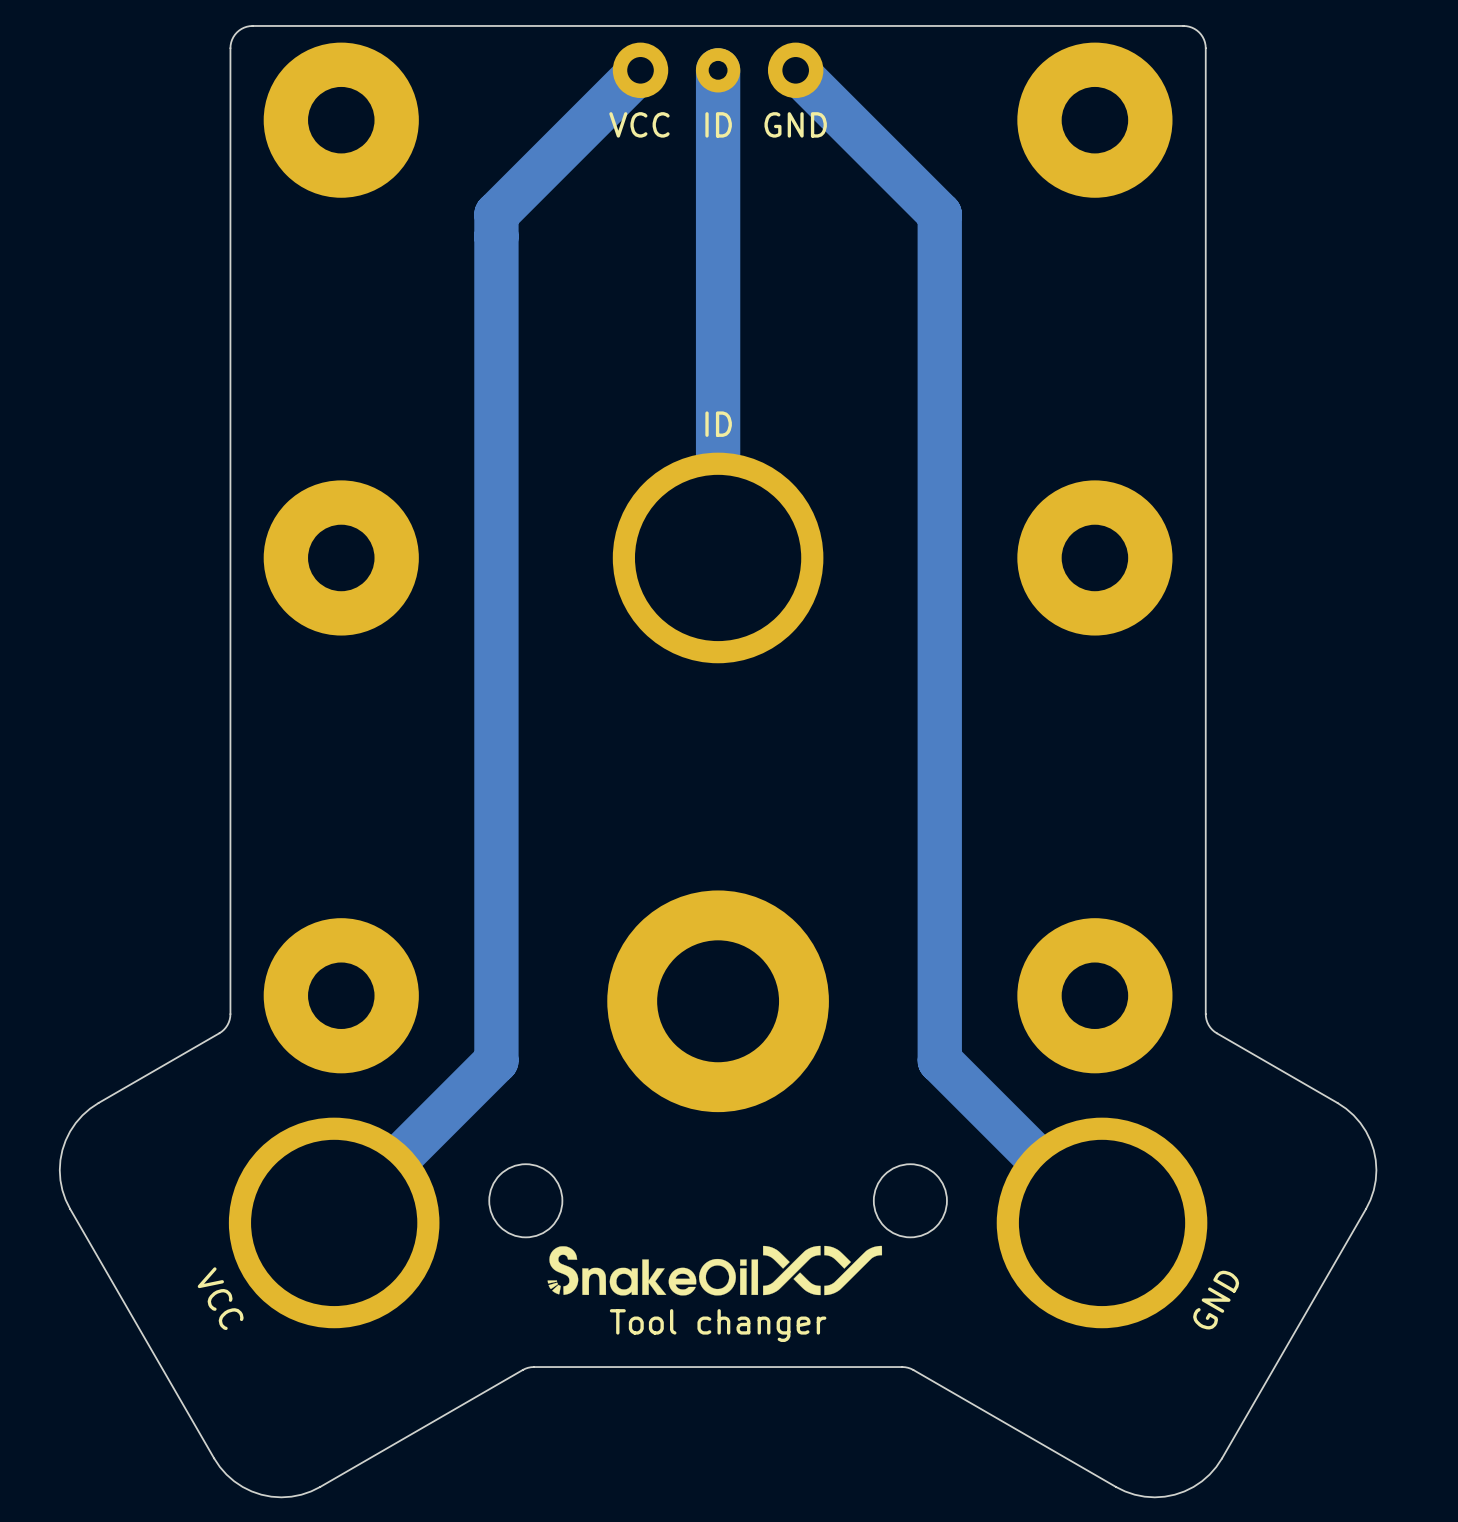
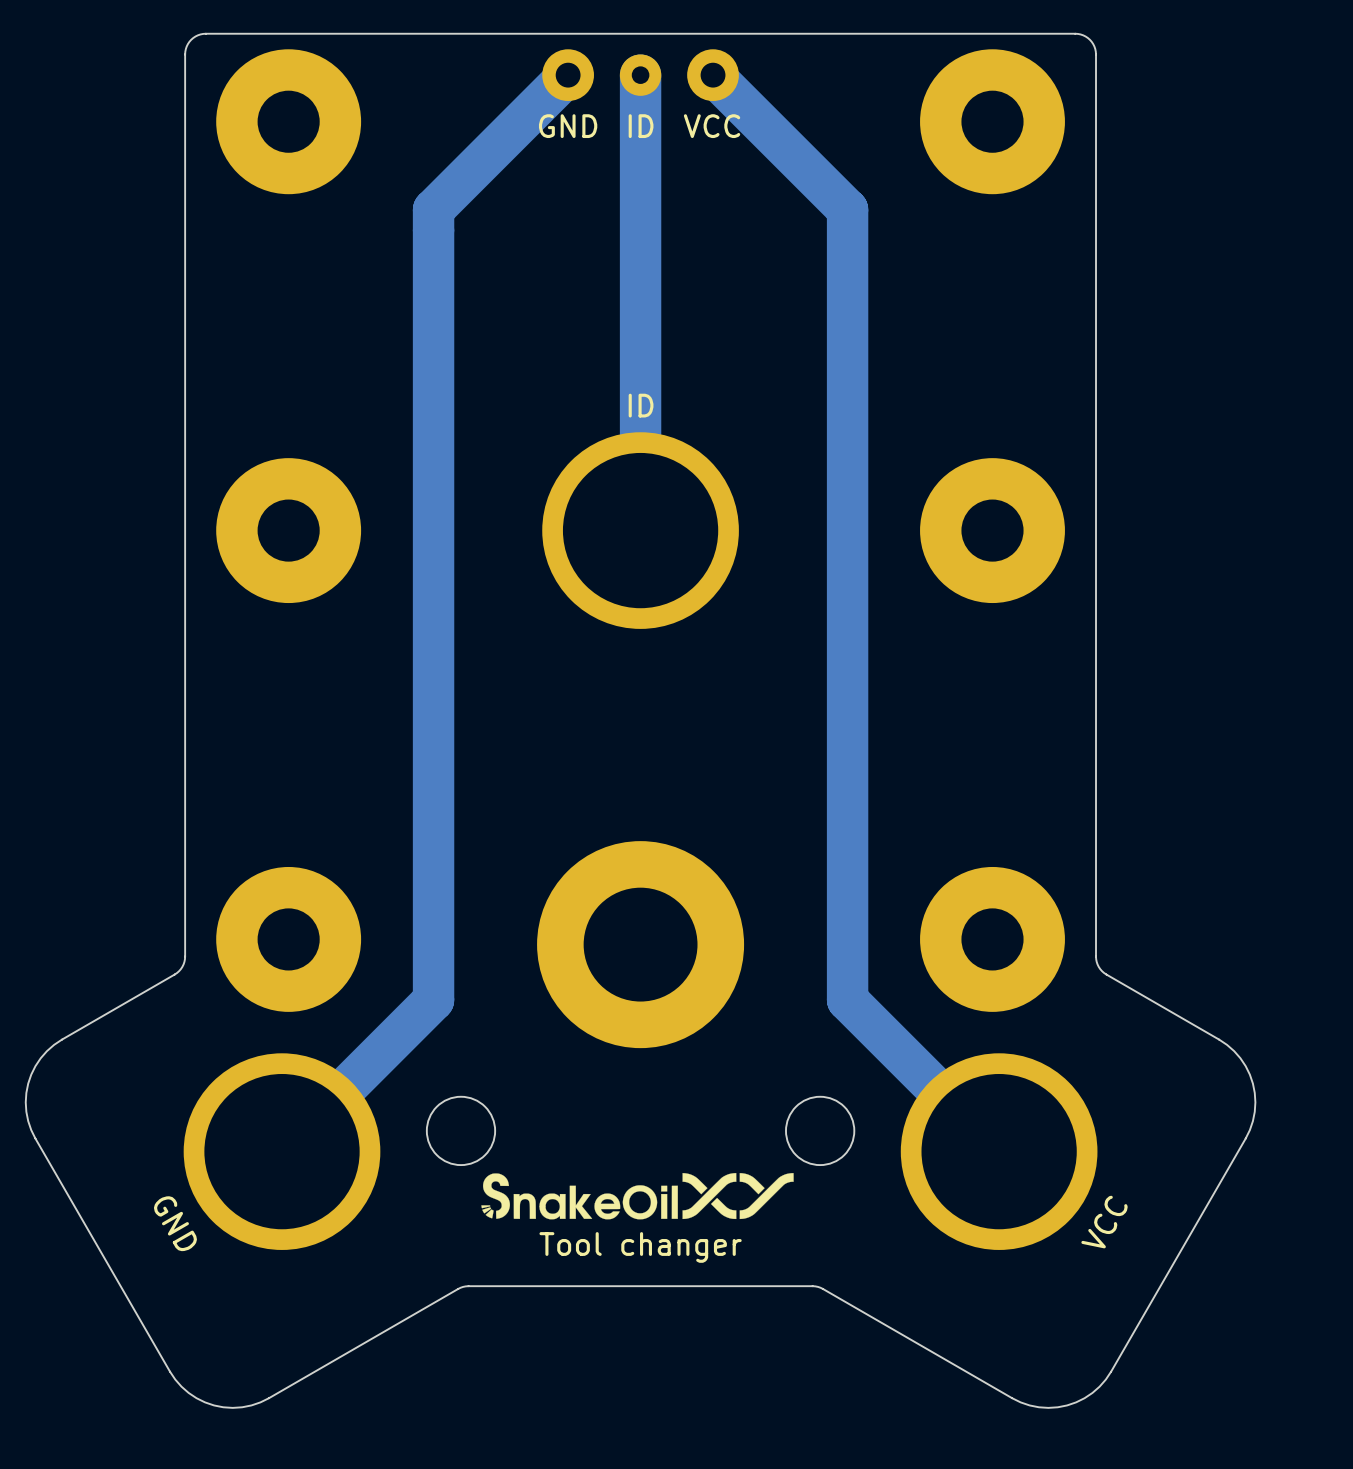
text: VCC (639, 124) -> GND (568, 126)
text: GND (795, 124) -> VCC (712, 126)
text: VCC (220, 1298) -> GND (175, 1223)
text: GND (1216, 1300) -> VCC (1104, 1222)

